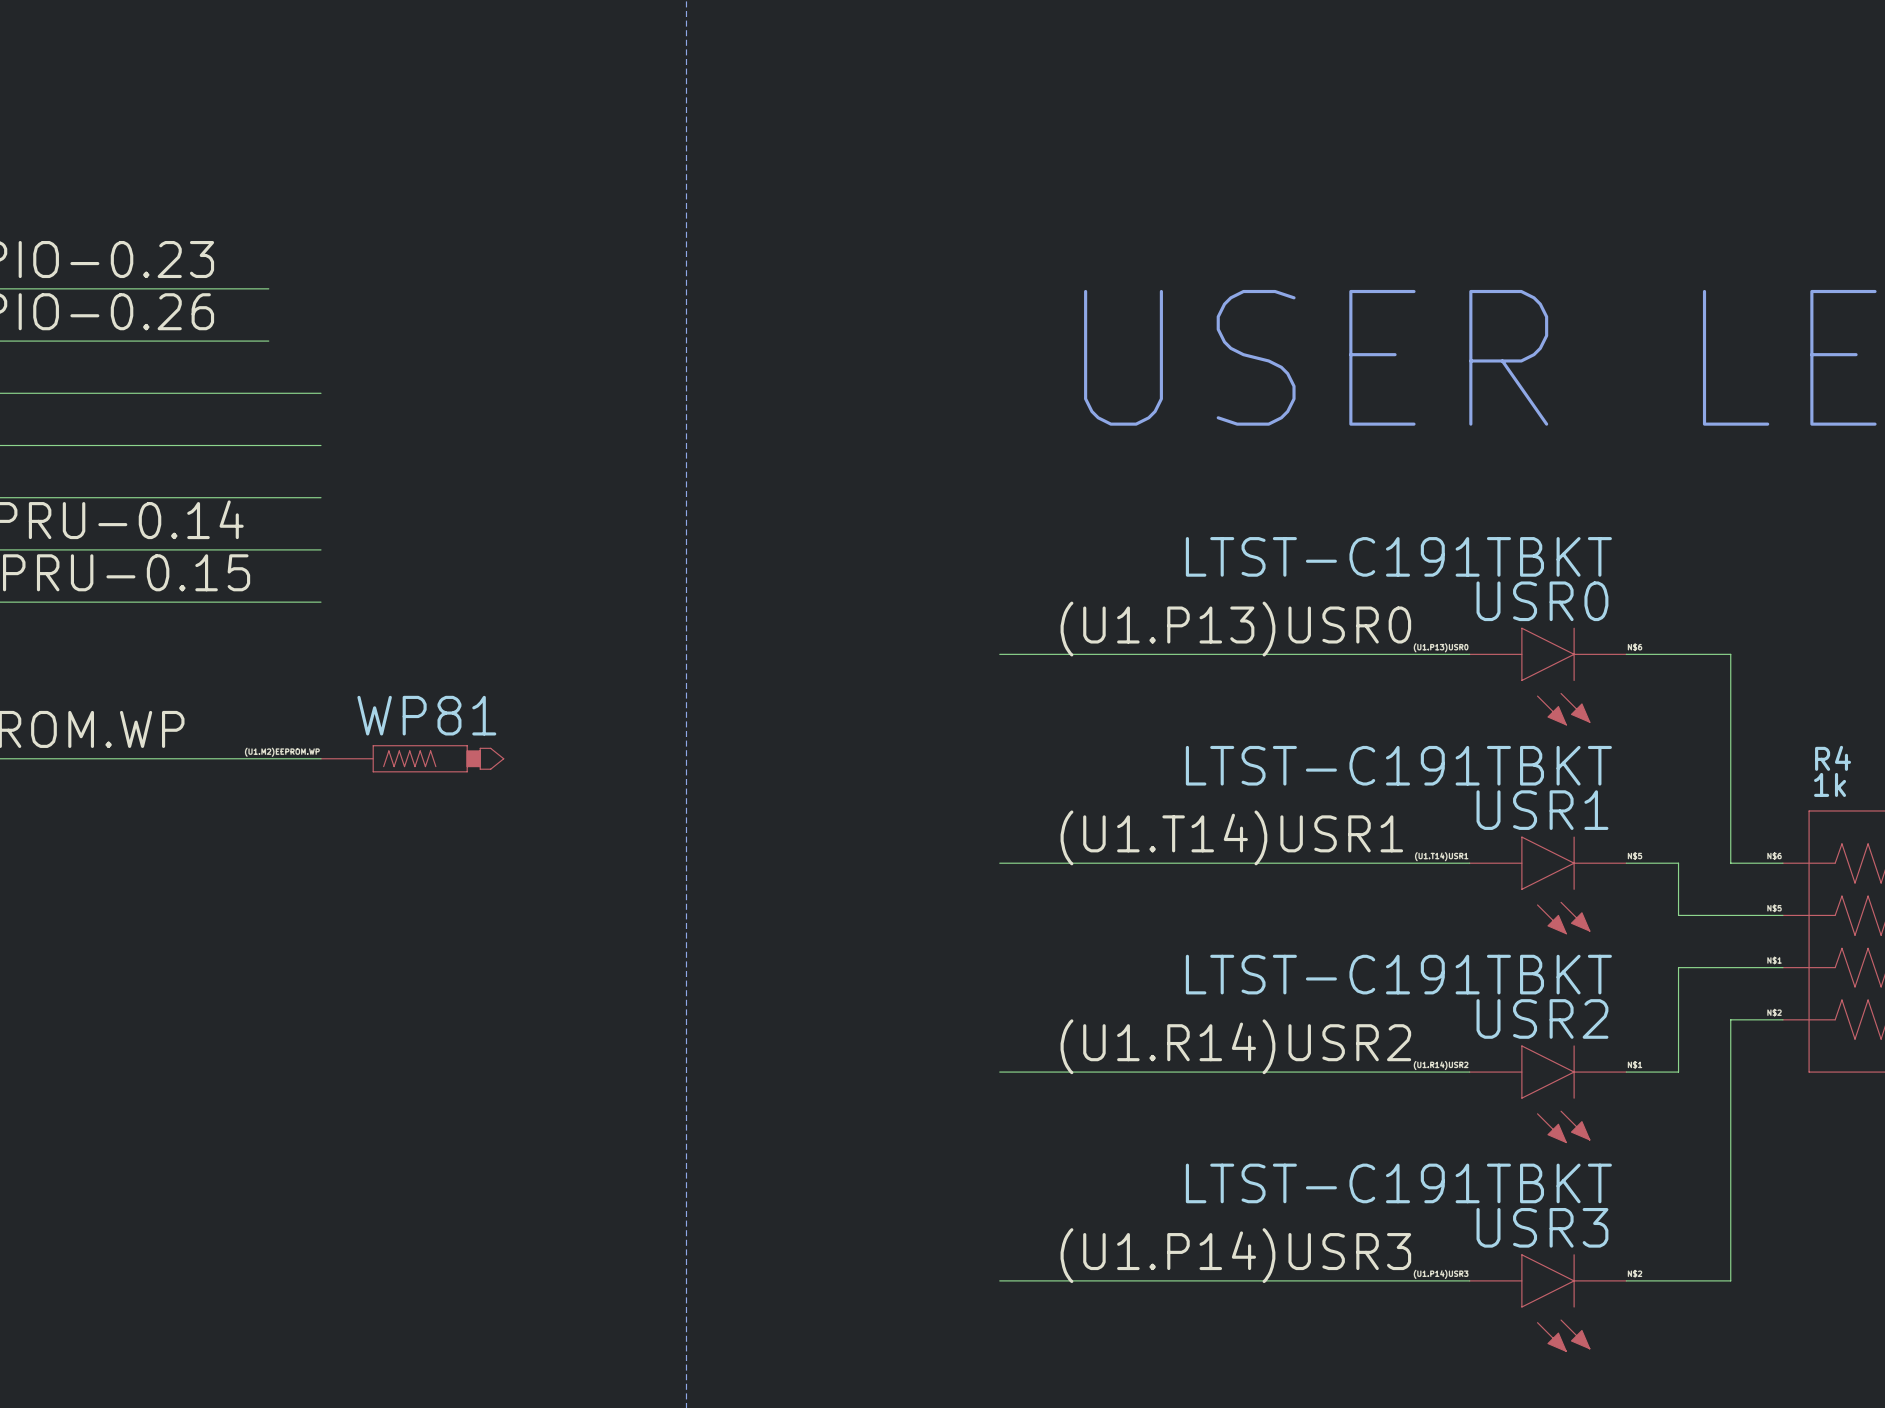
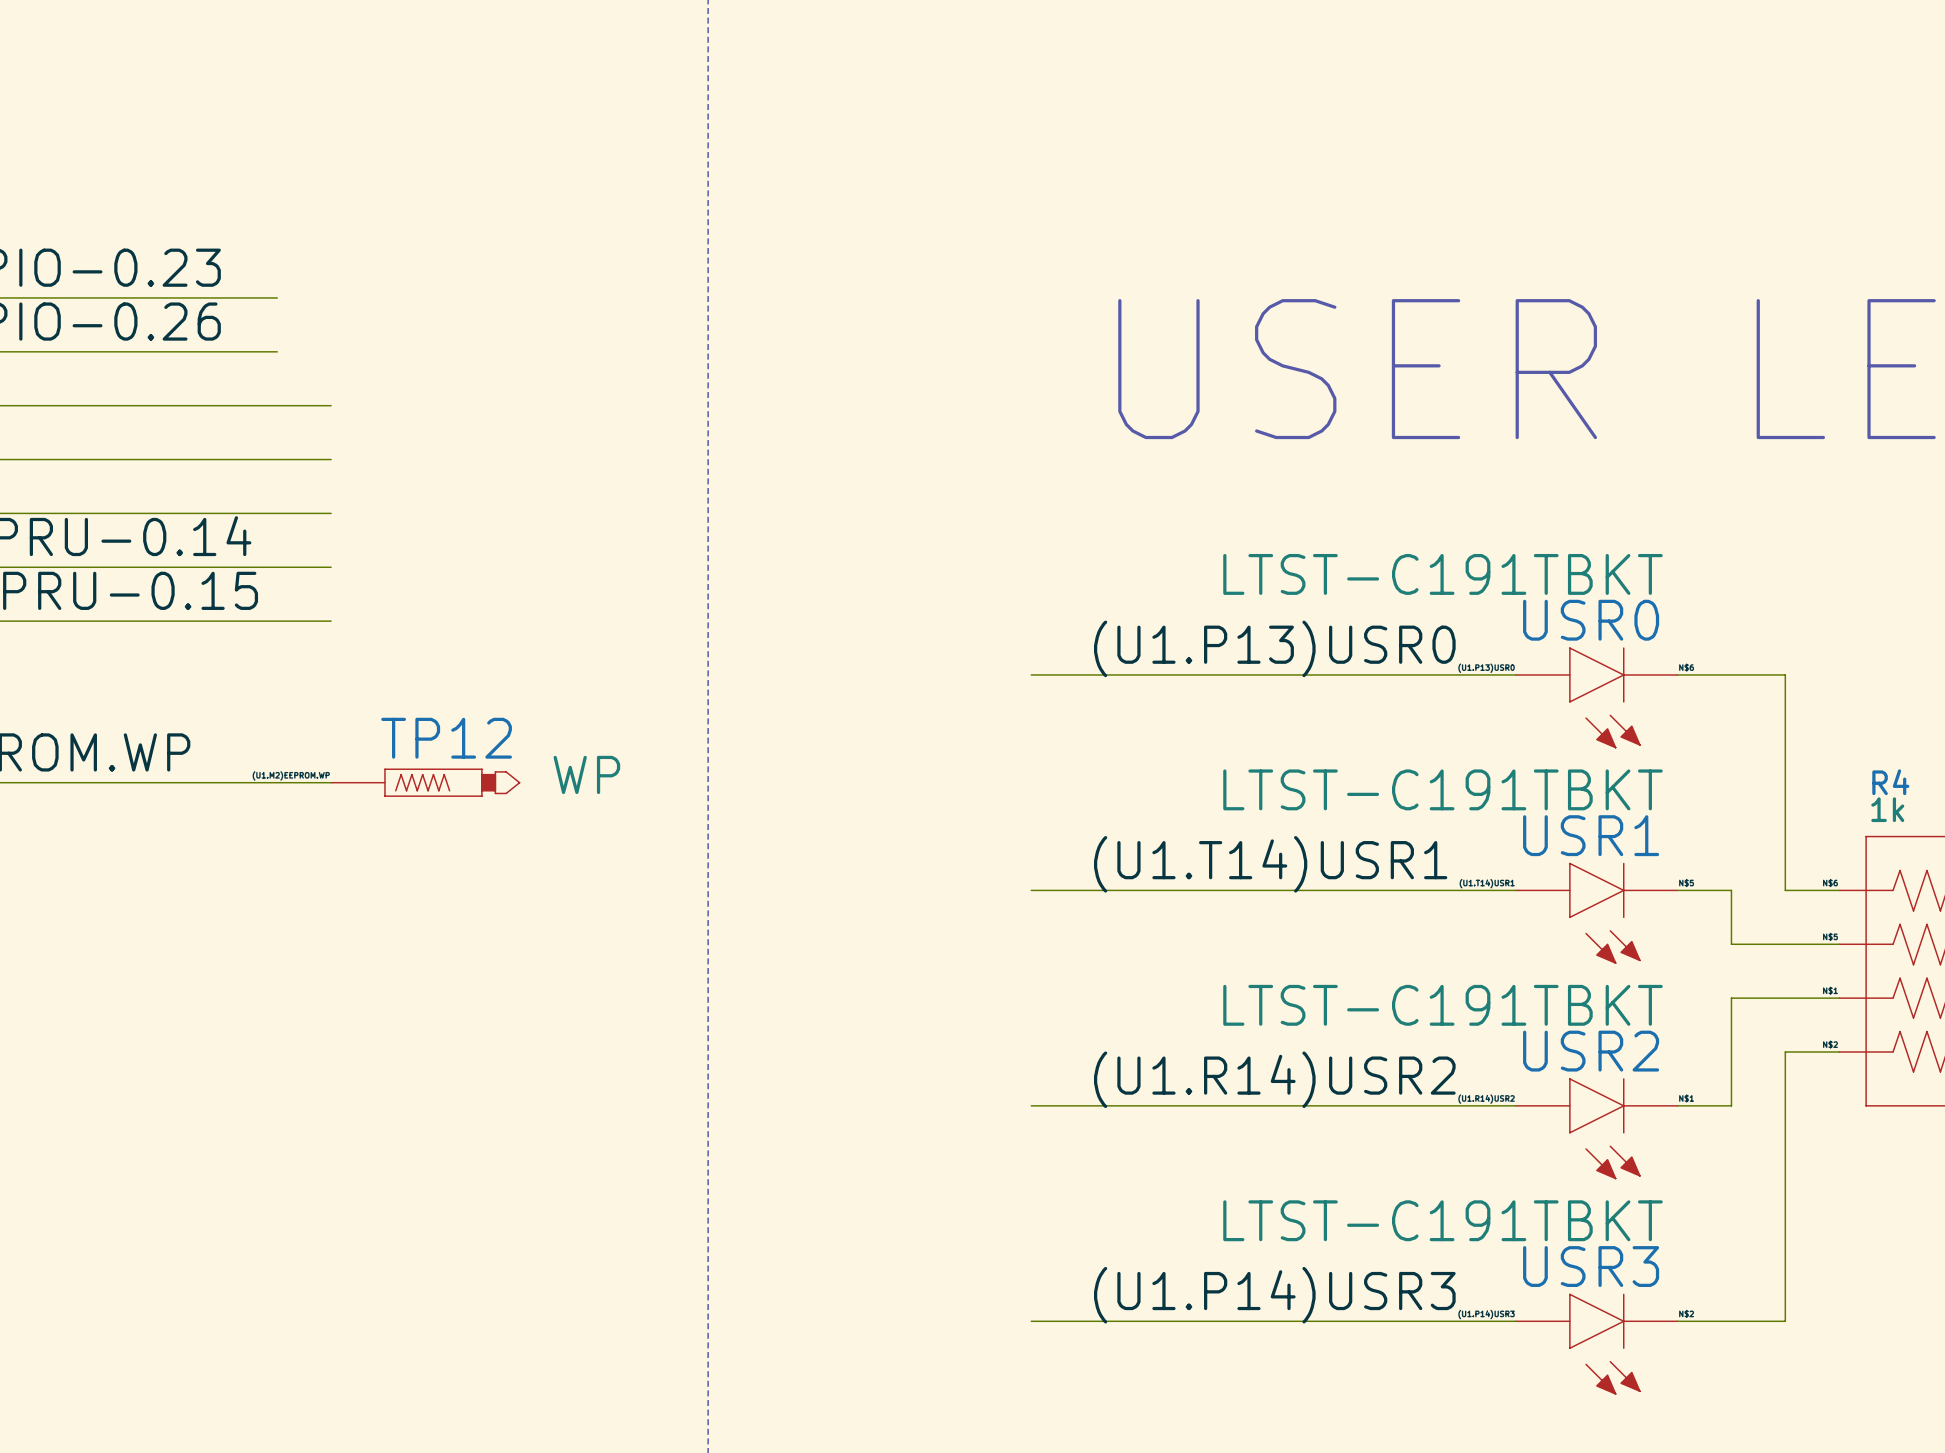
WP81 name: WP81 (426, 715) -> TP12 (446, 738)
WP81 value: none -> WP (586, 774)

